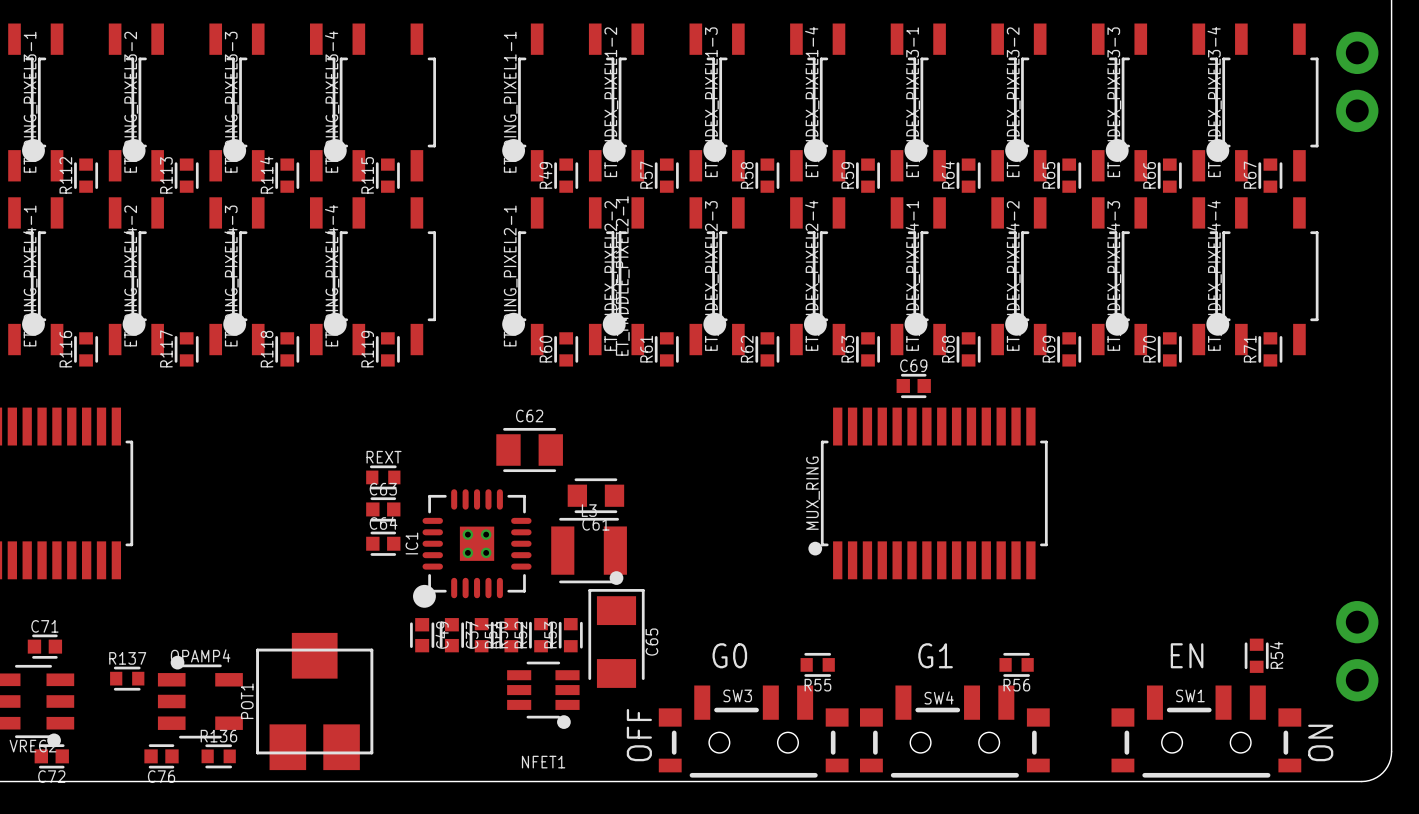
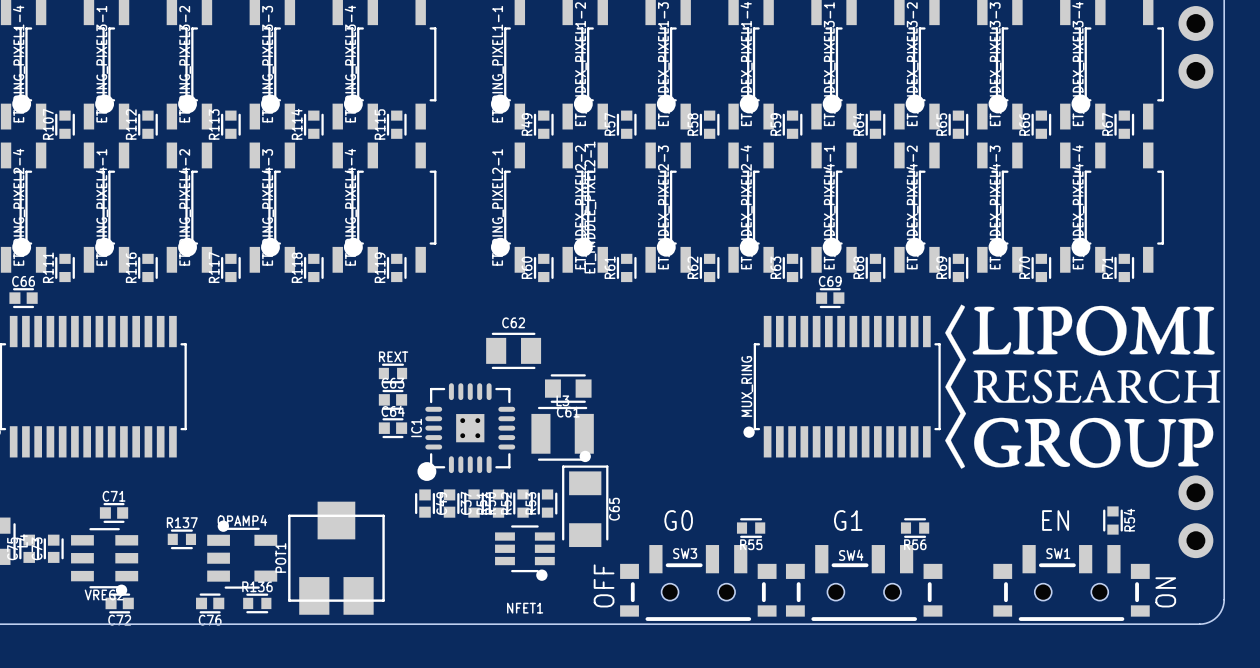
drawing: none -> [945, 304, 1221, 469]

